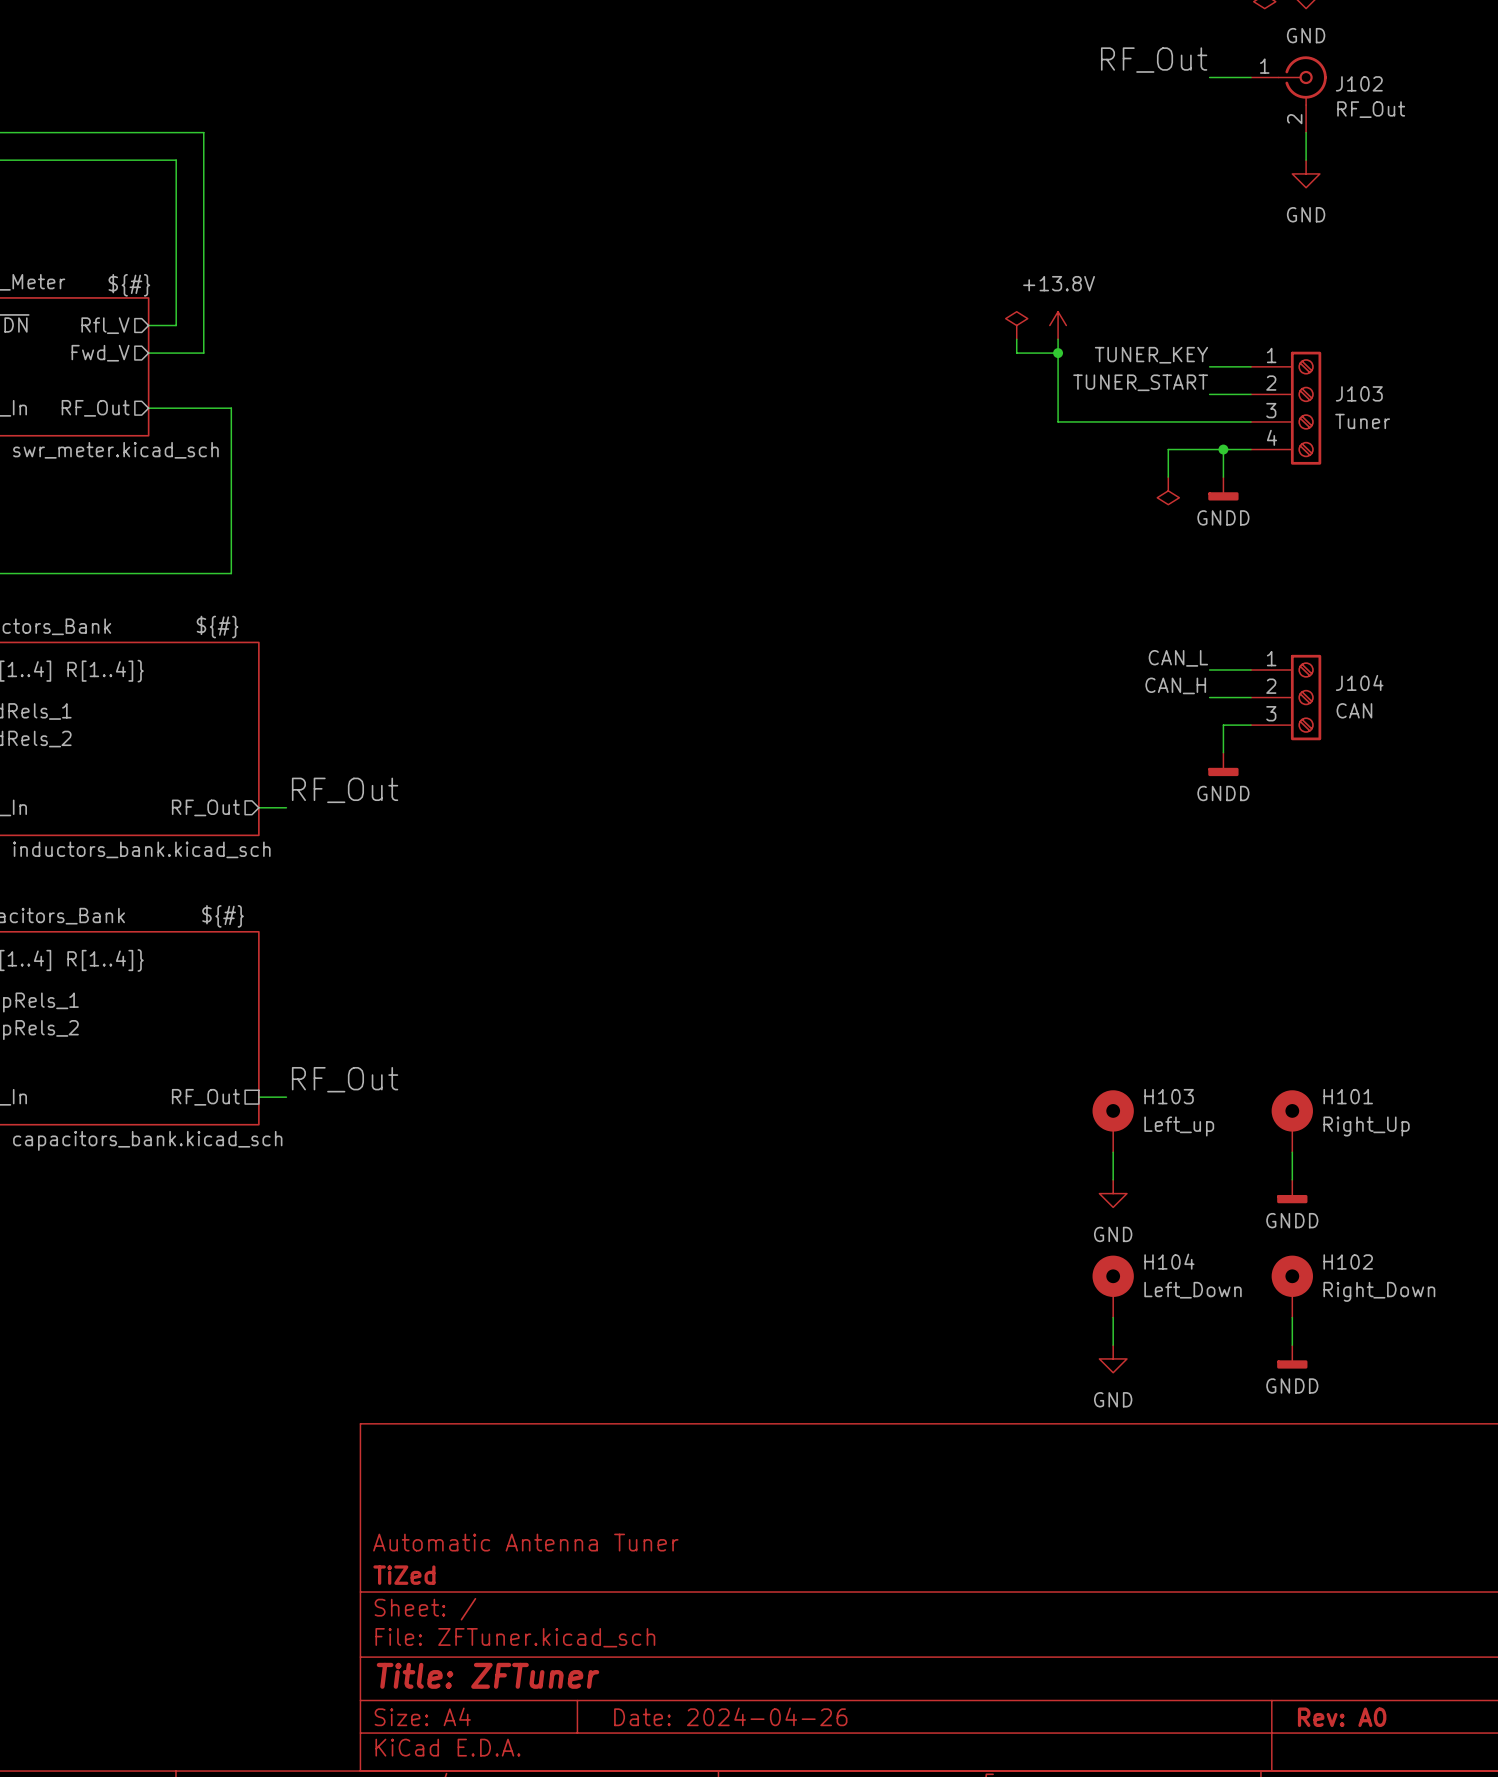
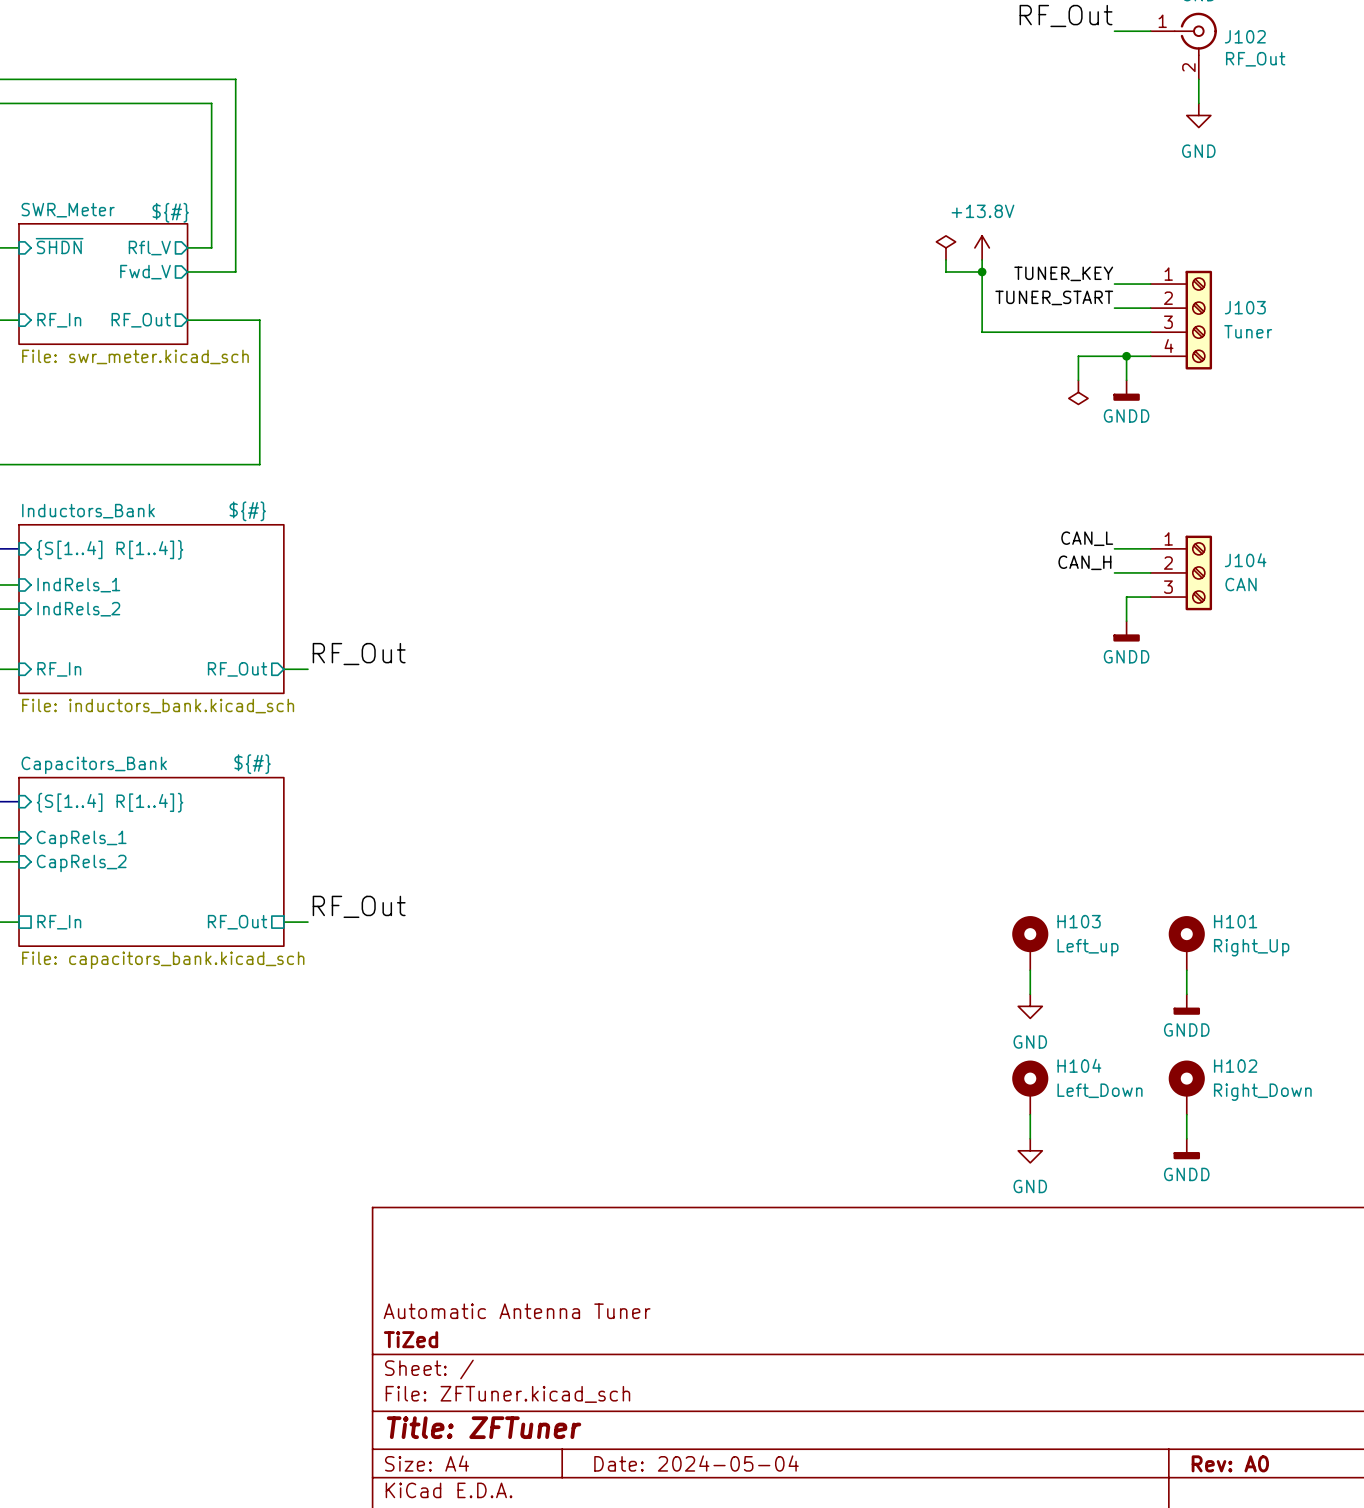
title block: Date: 2024-04-26 (730, 1716) -> Date: 2024-05-04 (696, 1463)

